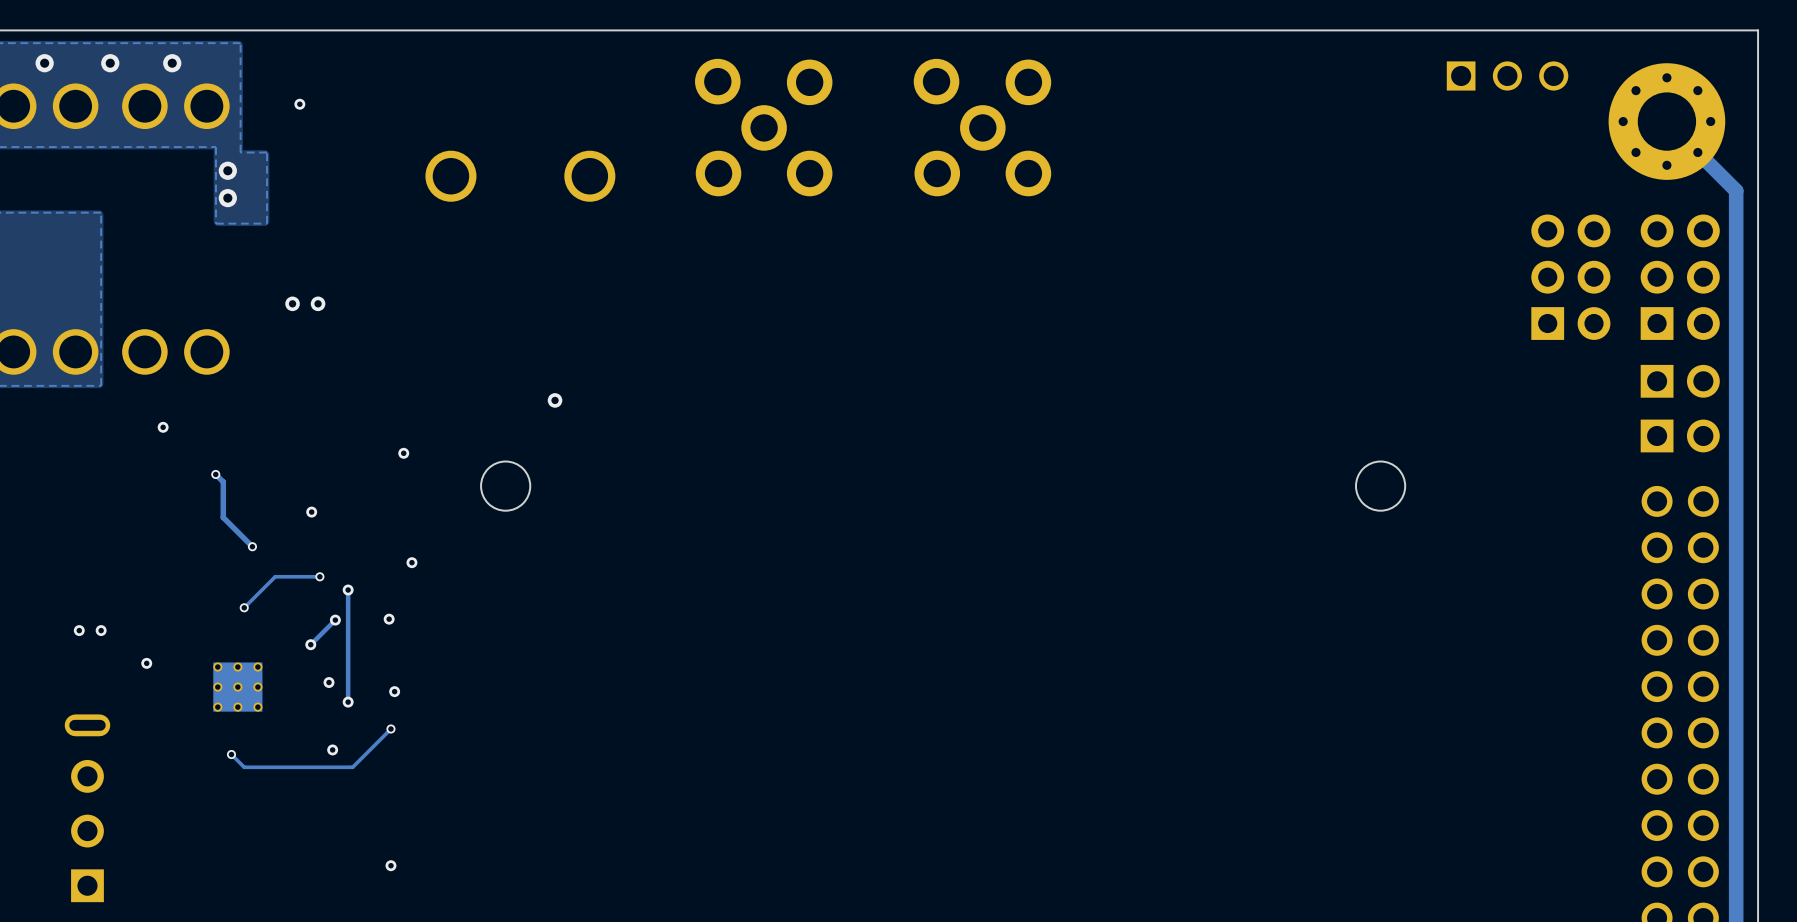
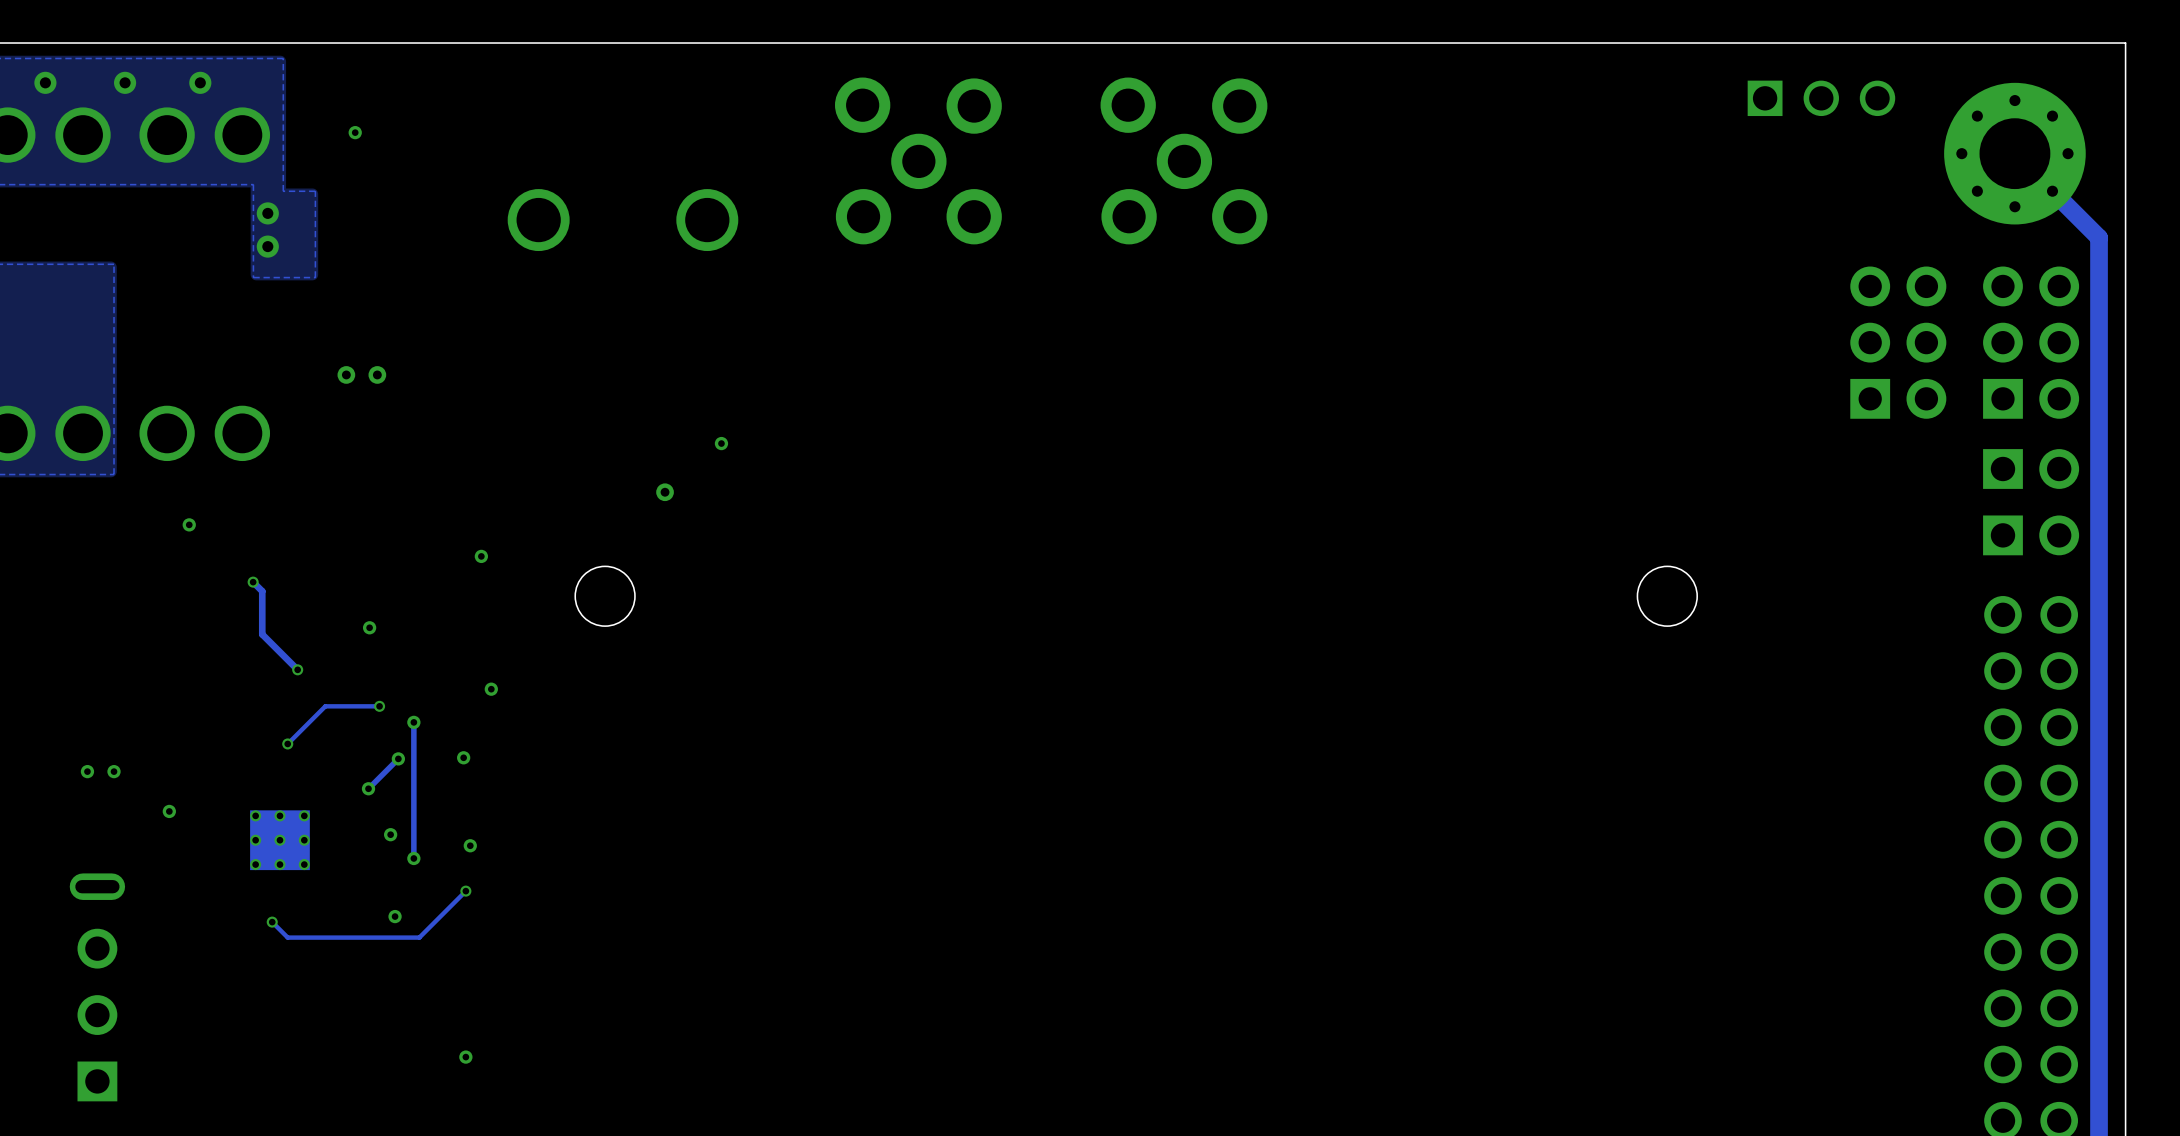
via: none -> (721, 443)

